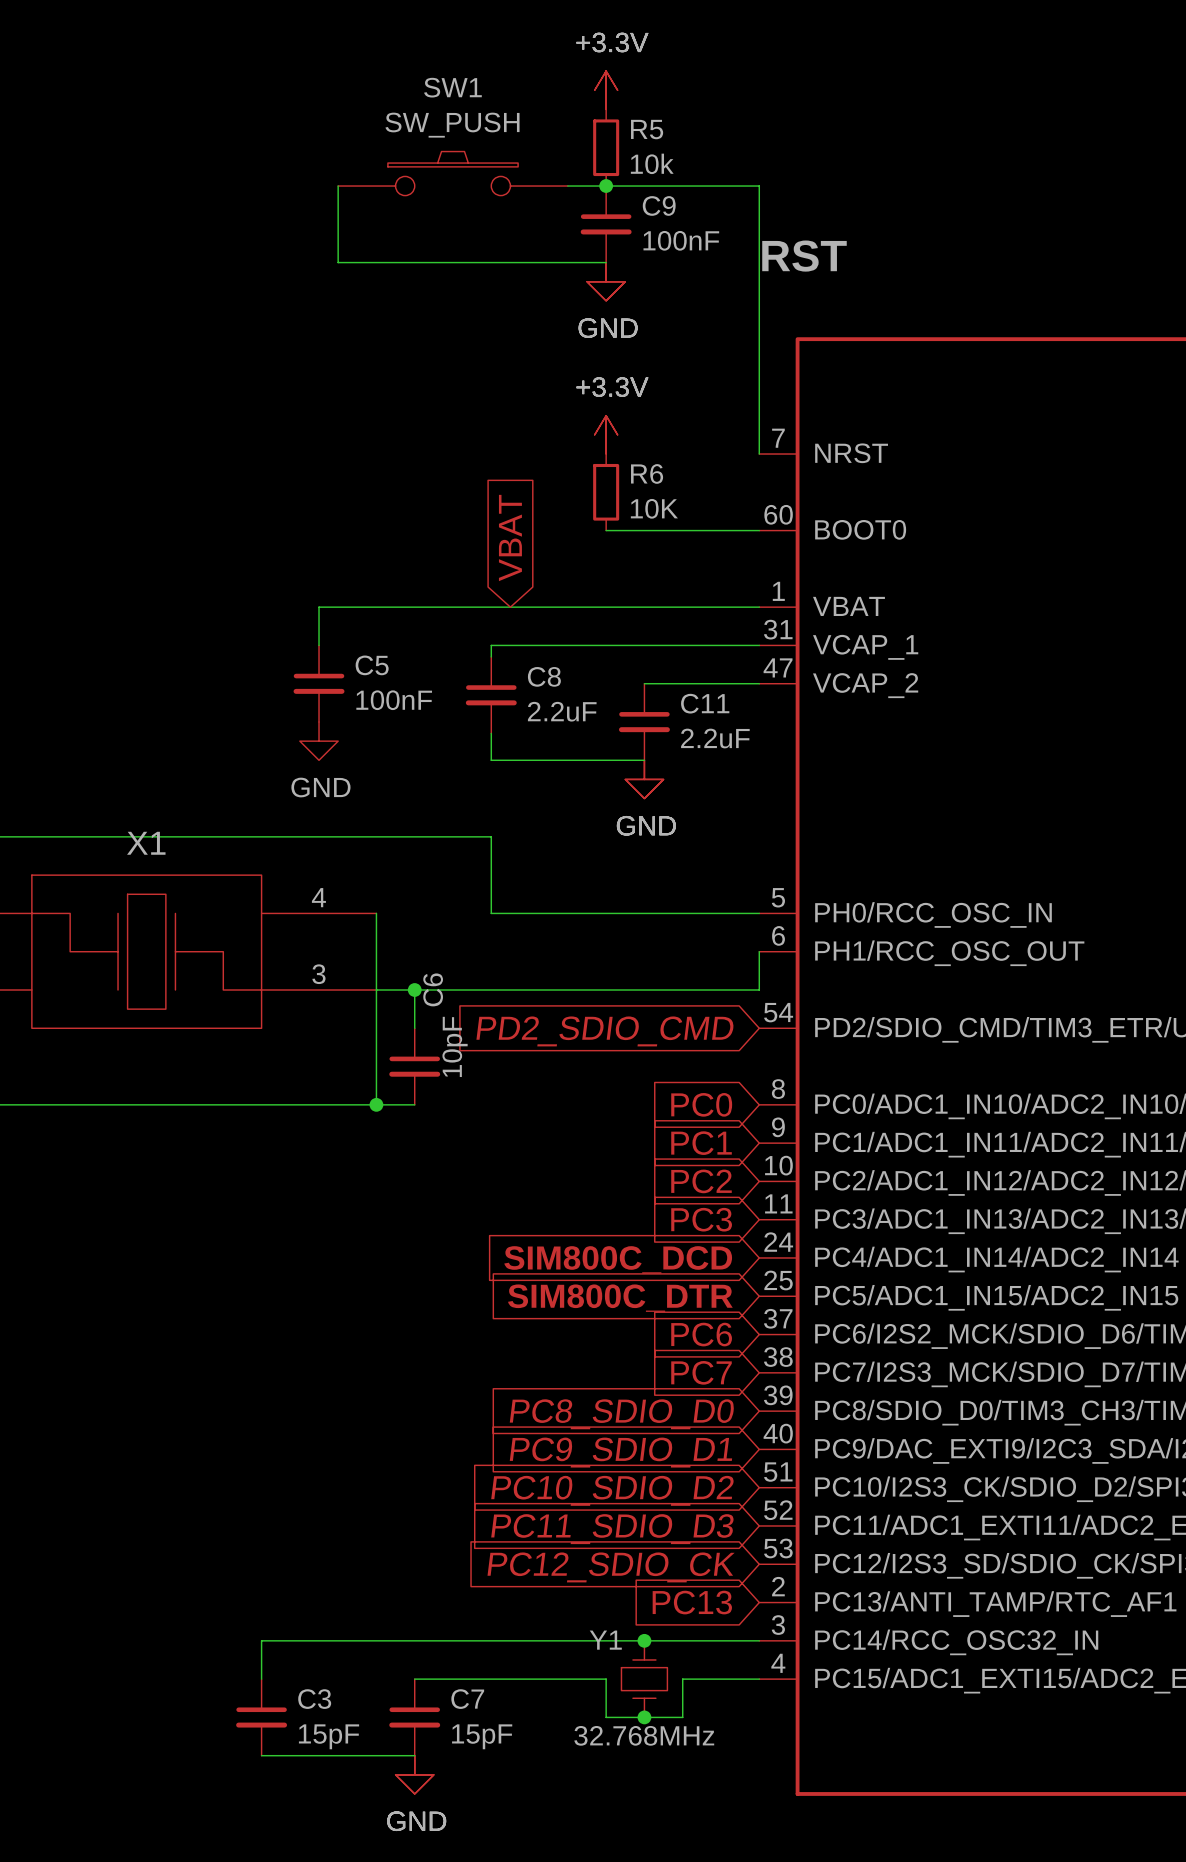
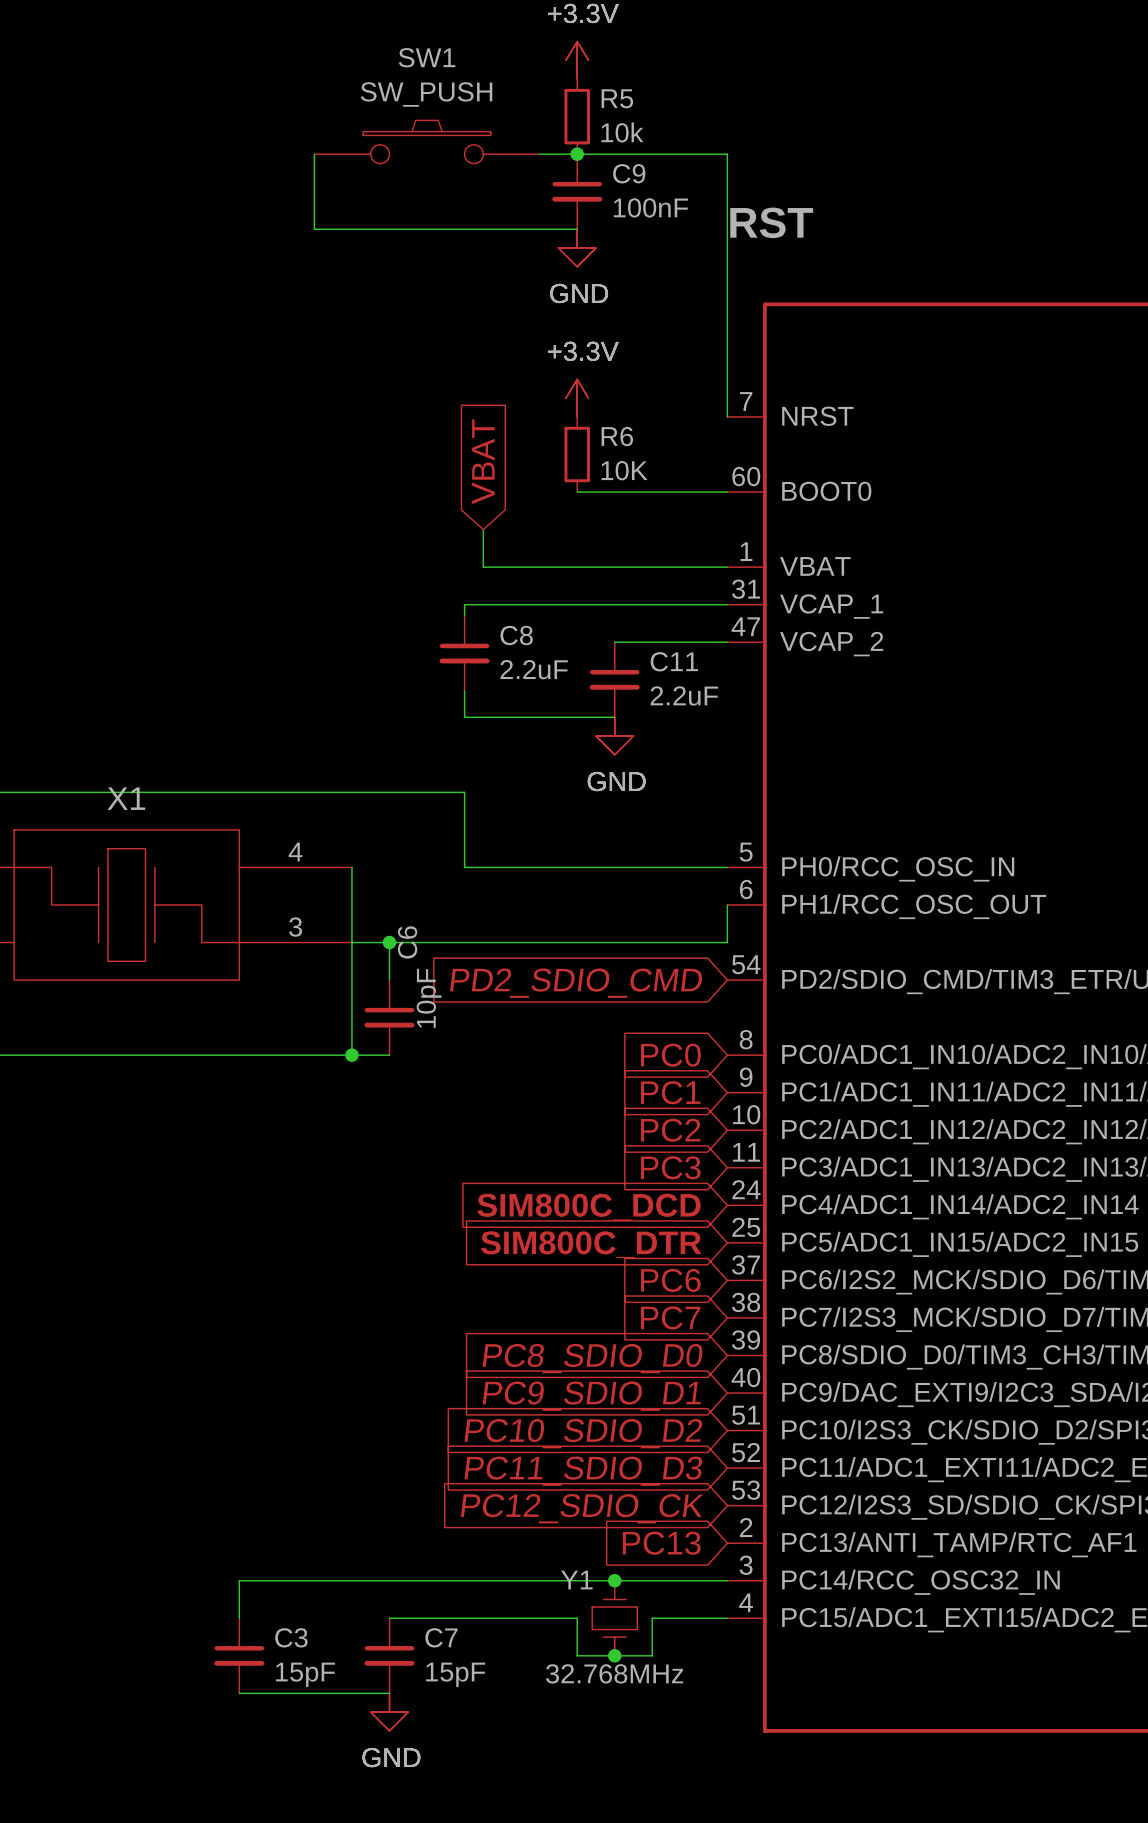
global label position: VBAT (510, 538) -> VBAT (483, 461)
wire: (510, 607) (319, 607) (319, 645) -> (483, 567) (483, 529)
C5: 100nF (319, 683) -> none
power symbol: GND (319, 741) -> none

